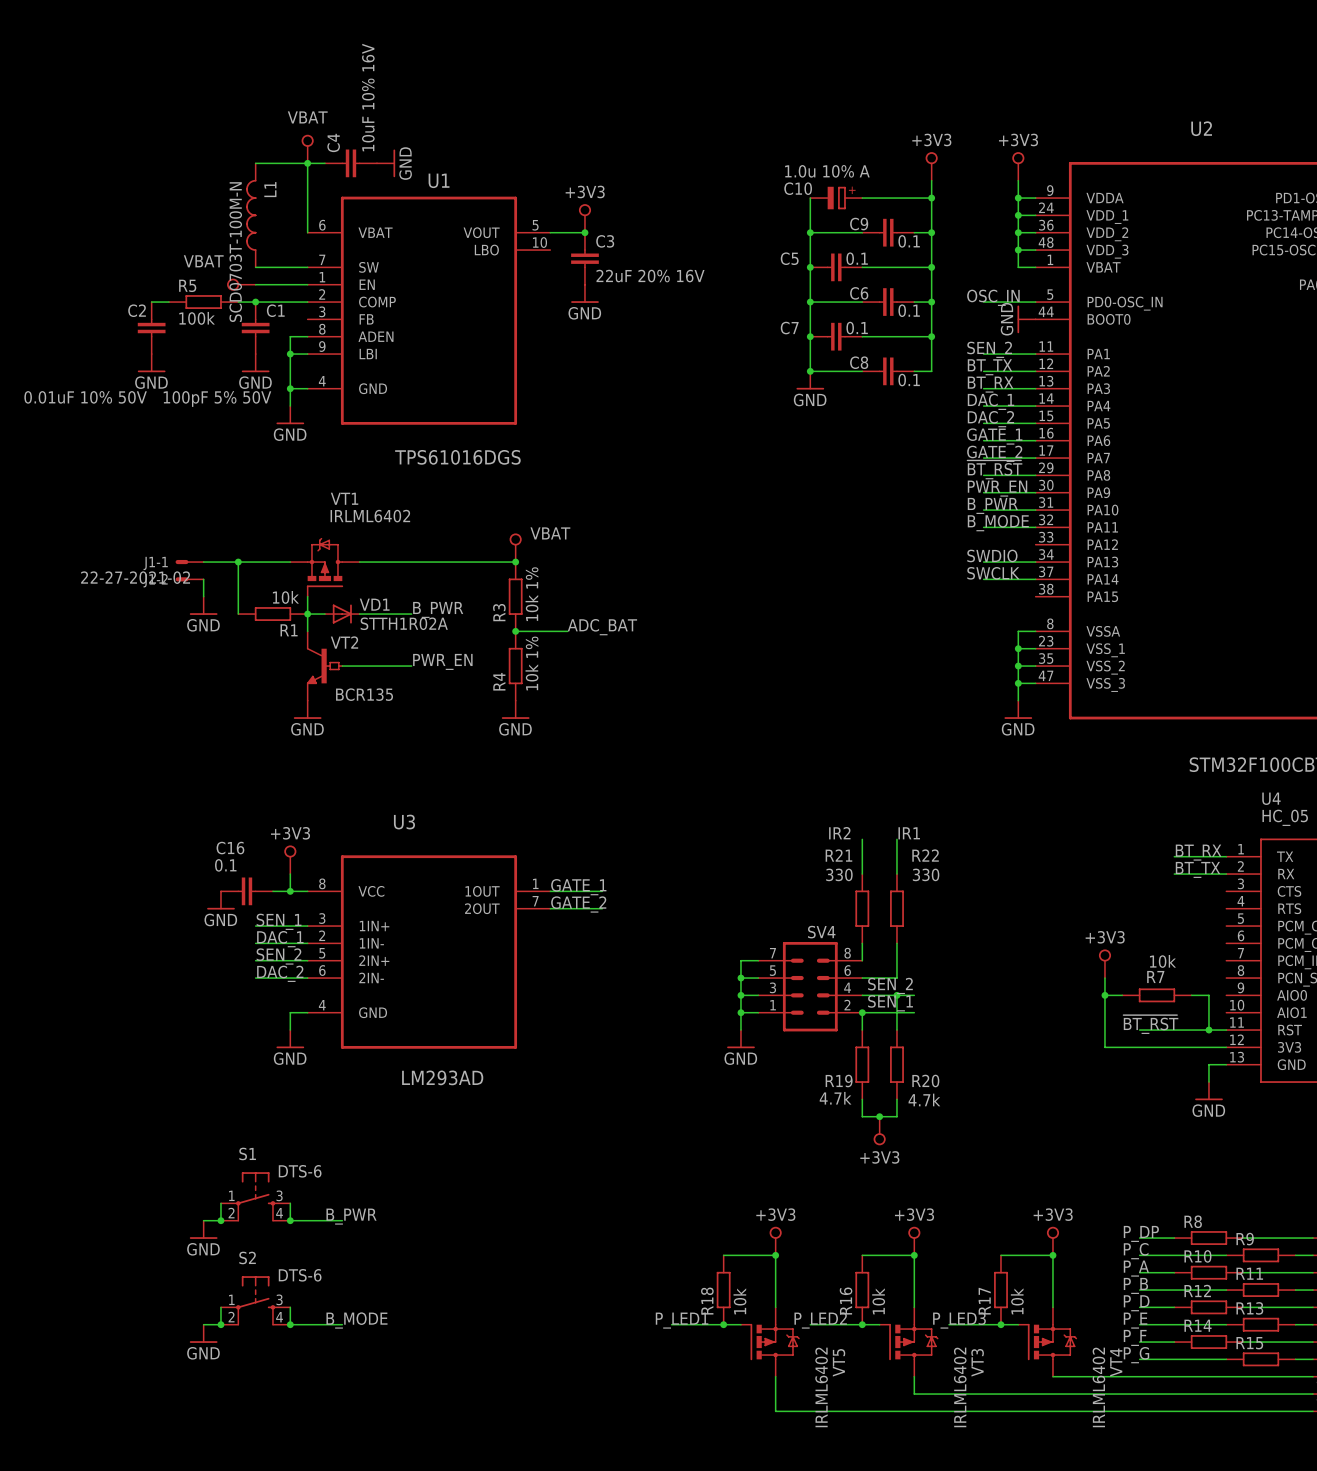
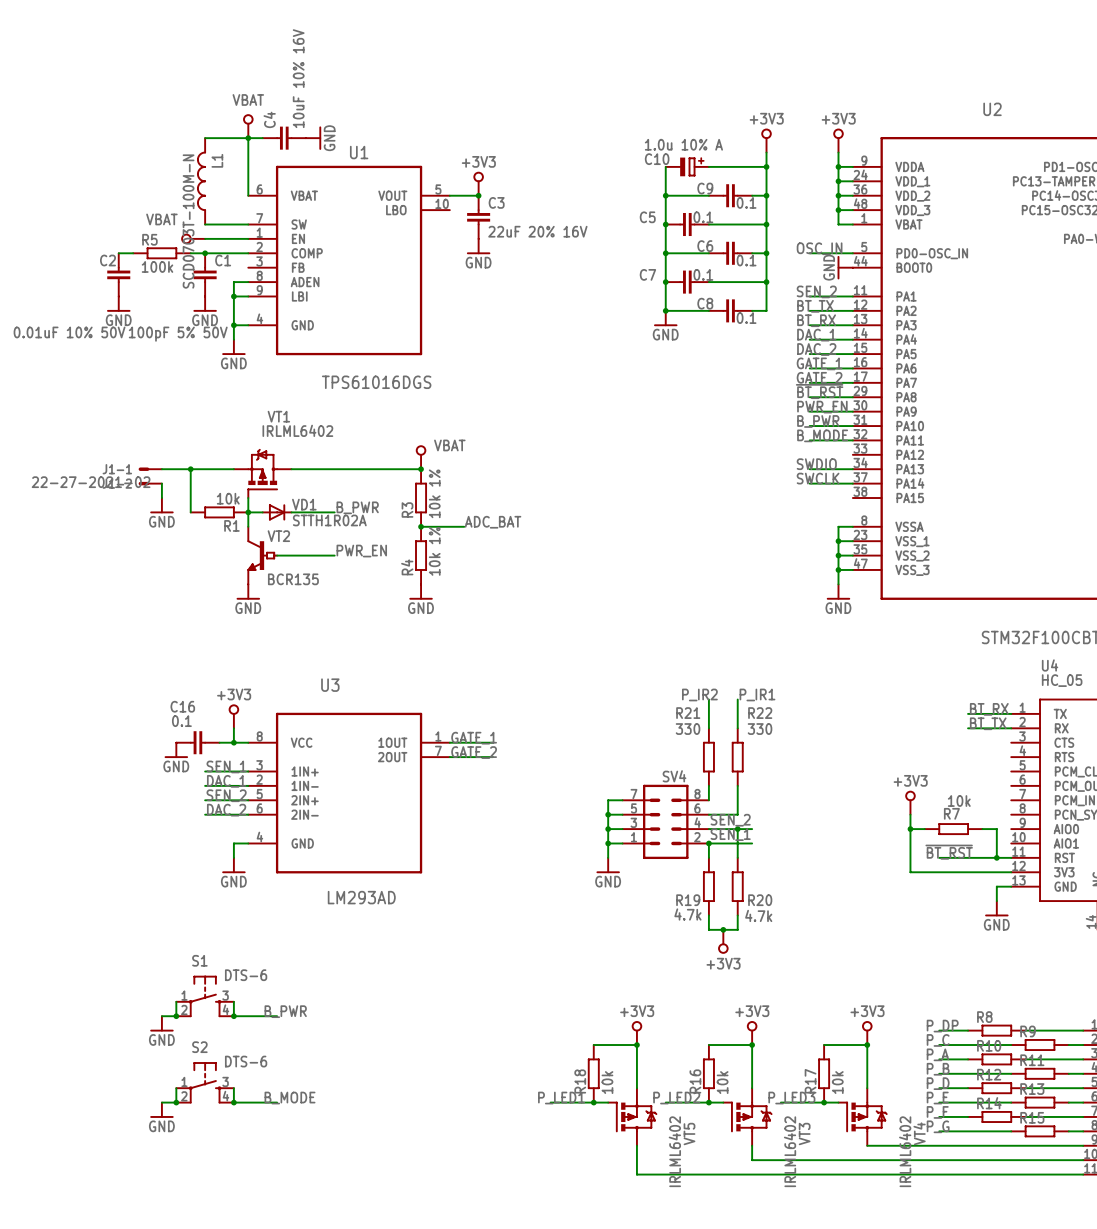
label: IR2 (839, 833) -> P_IR2 (699, 694)
label: IR1 (909, 833) -> P_IR1 (757, 694)

